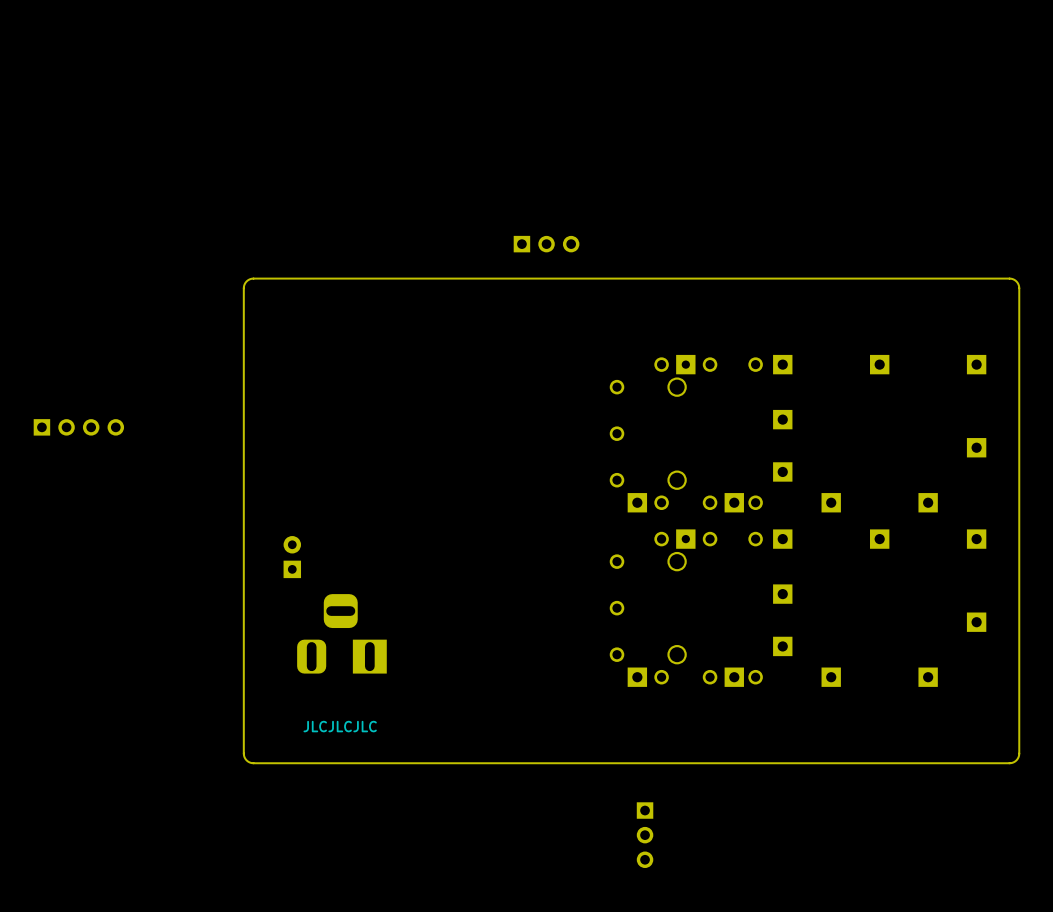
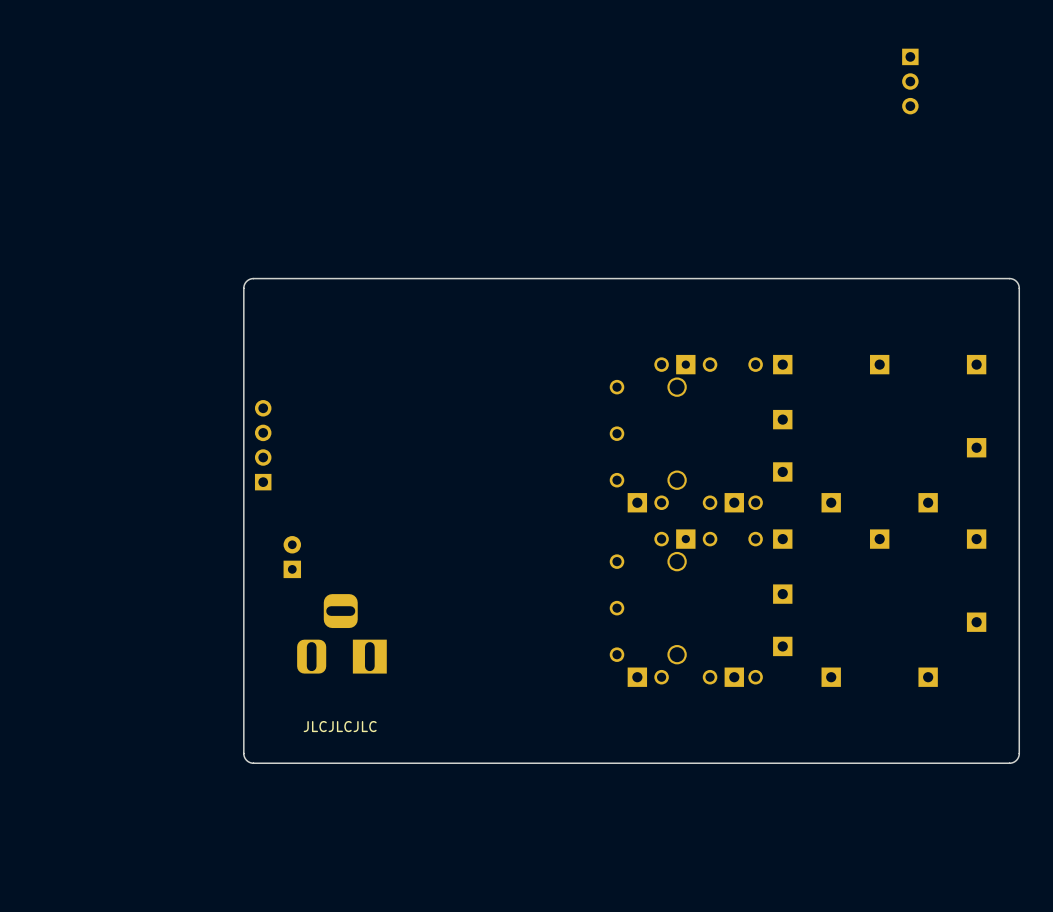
part: none -> (910, 81)
part: (546, 244) -> none
part rotation: 0° (78, 427) -> 90° counterclockwise (263, 445)
part position: (78, 427) -> (263, 445)
part: (645, 835) -> none

